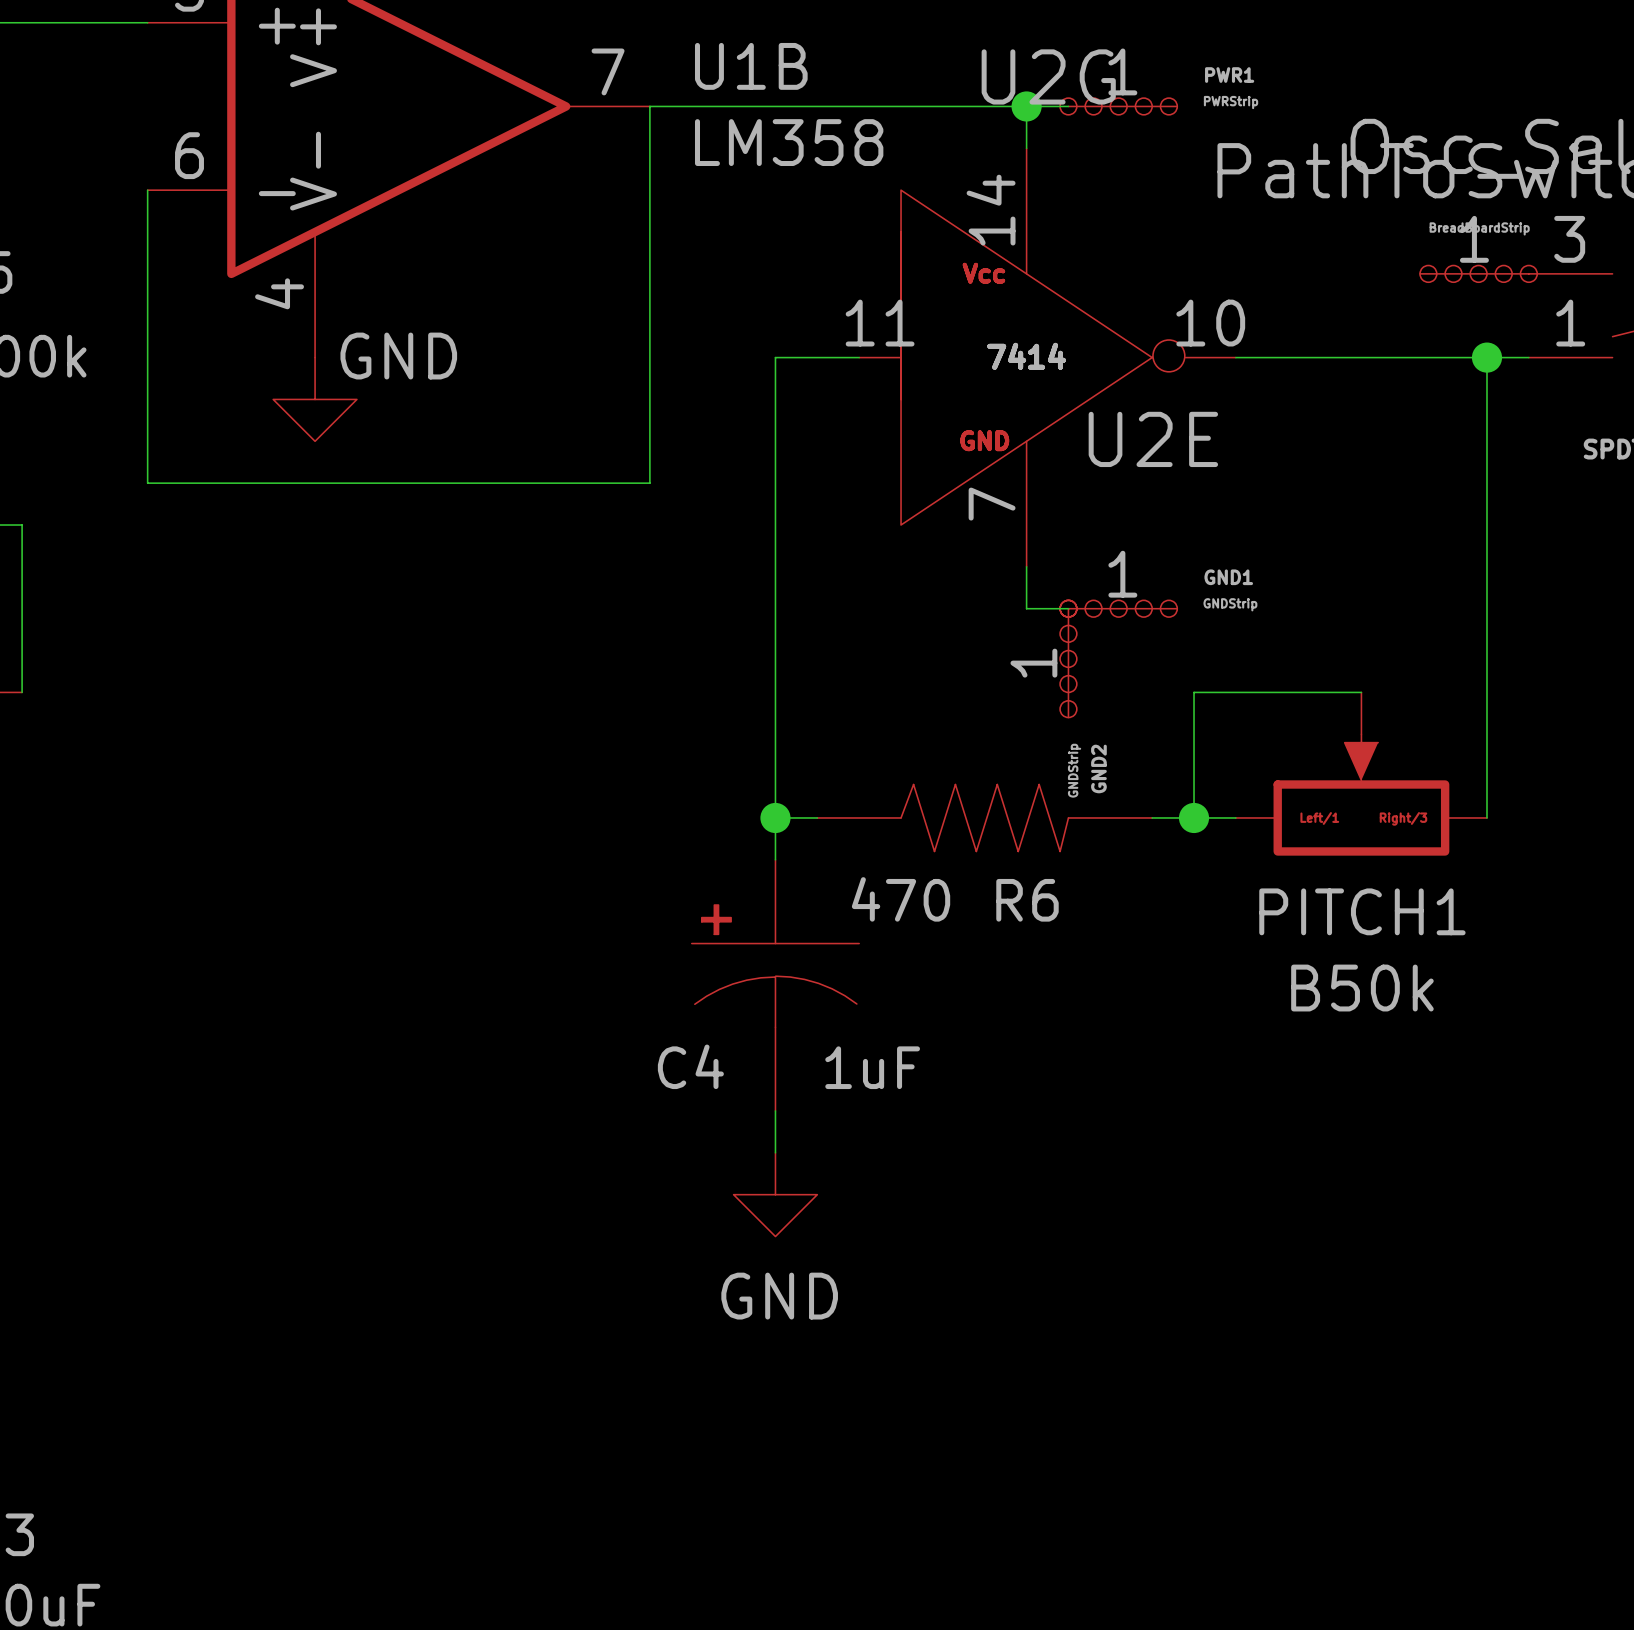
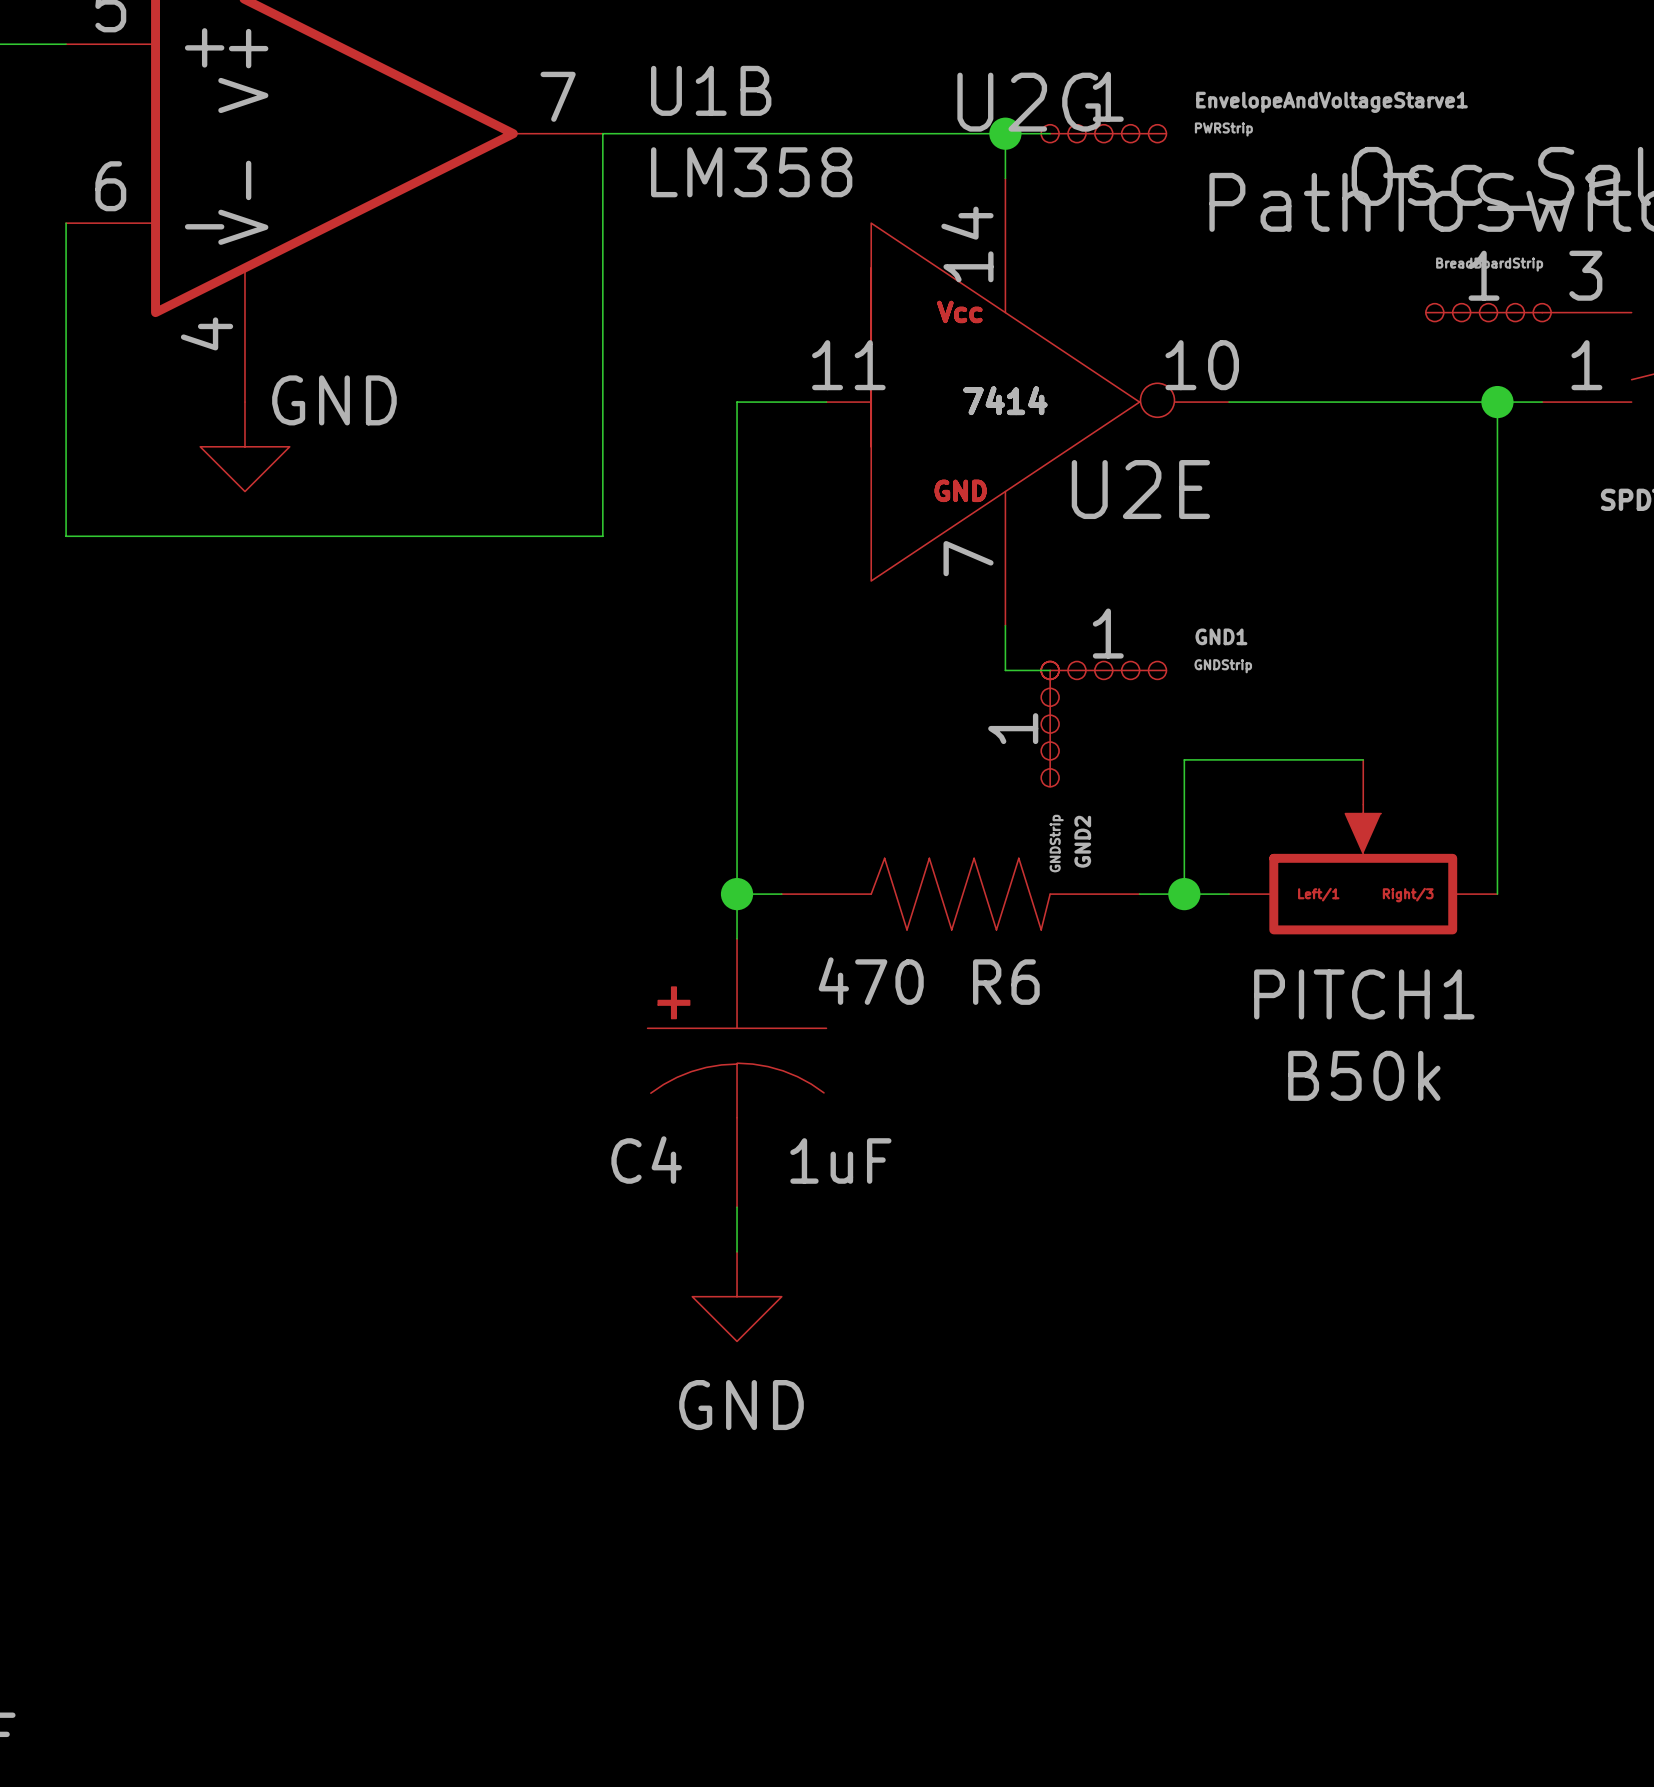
PWR1 name: PWR1 (1229, 75) -> EnvelopeAndVoltageStarve1 (1331, 102)

